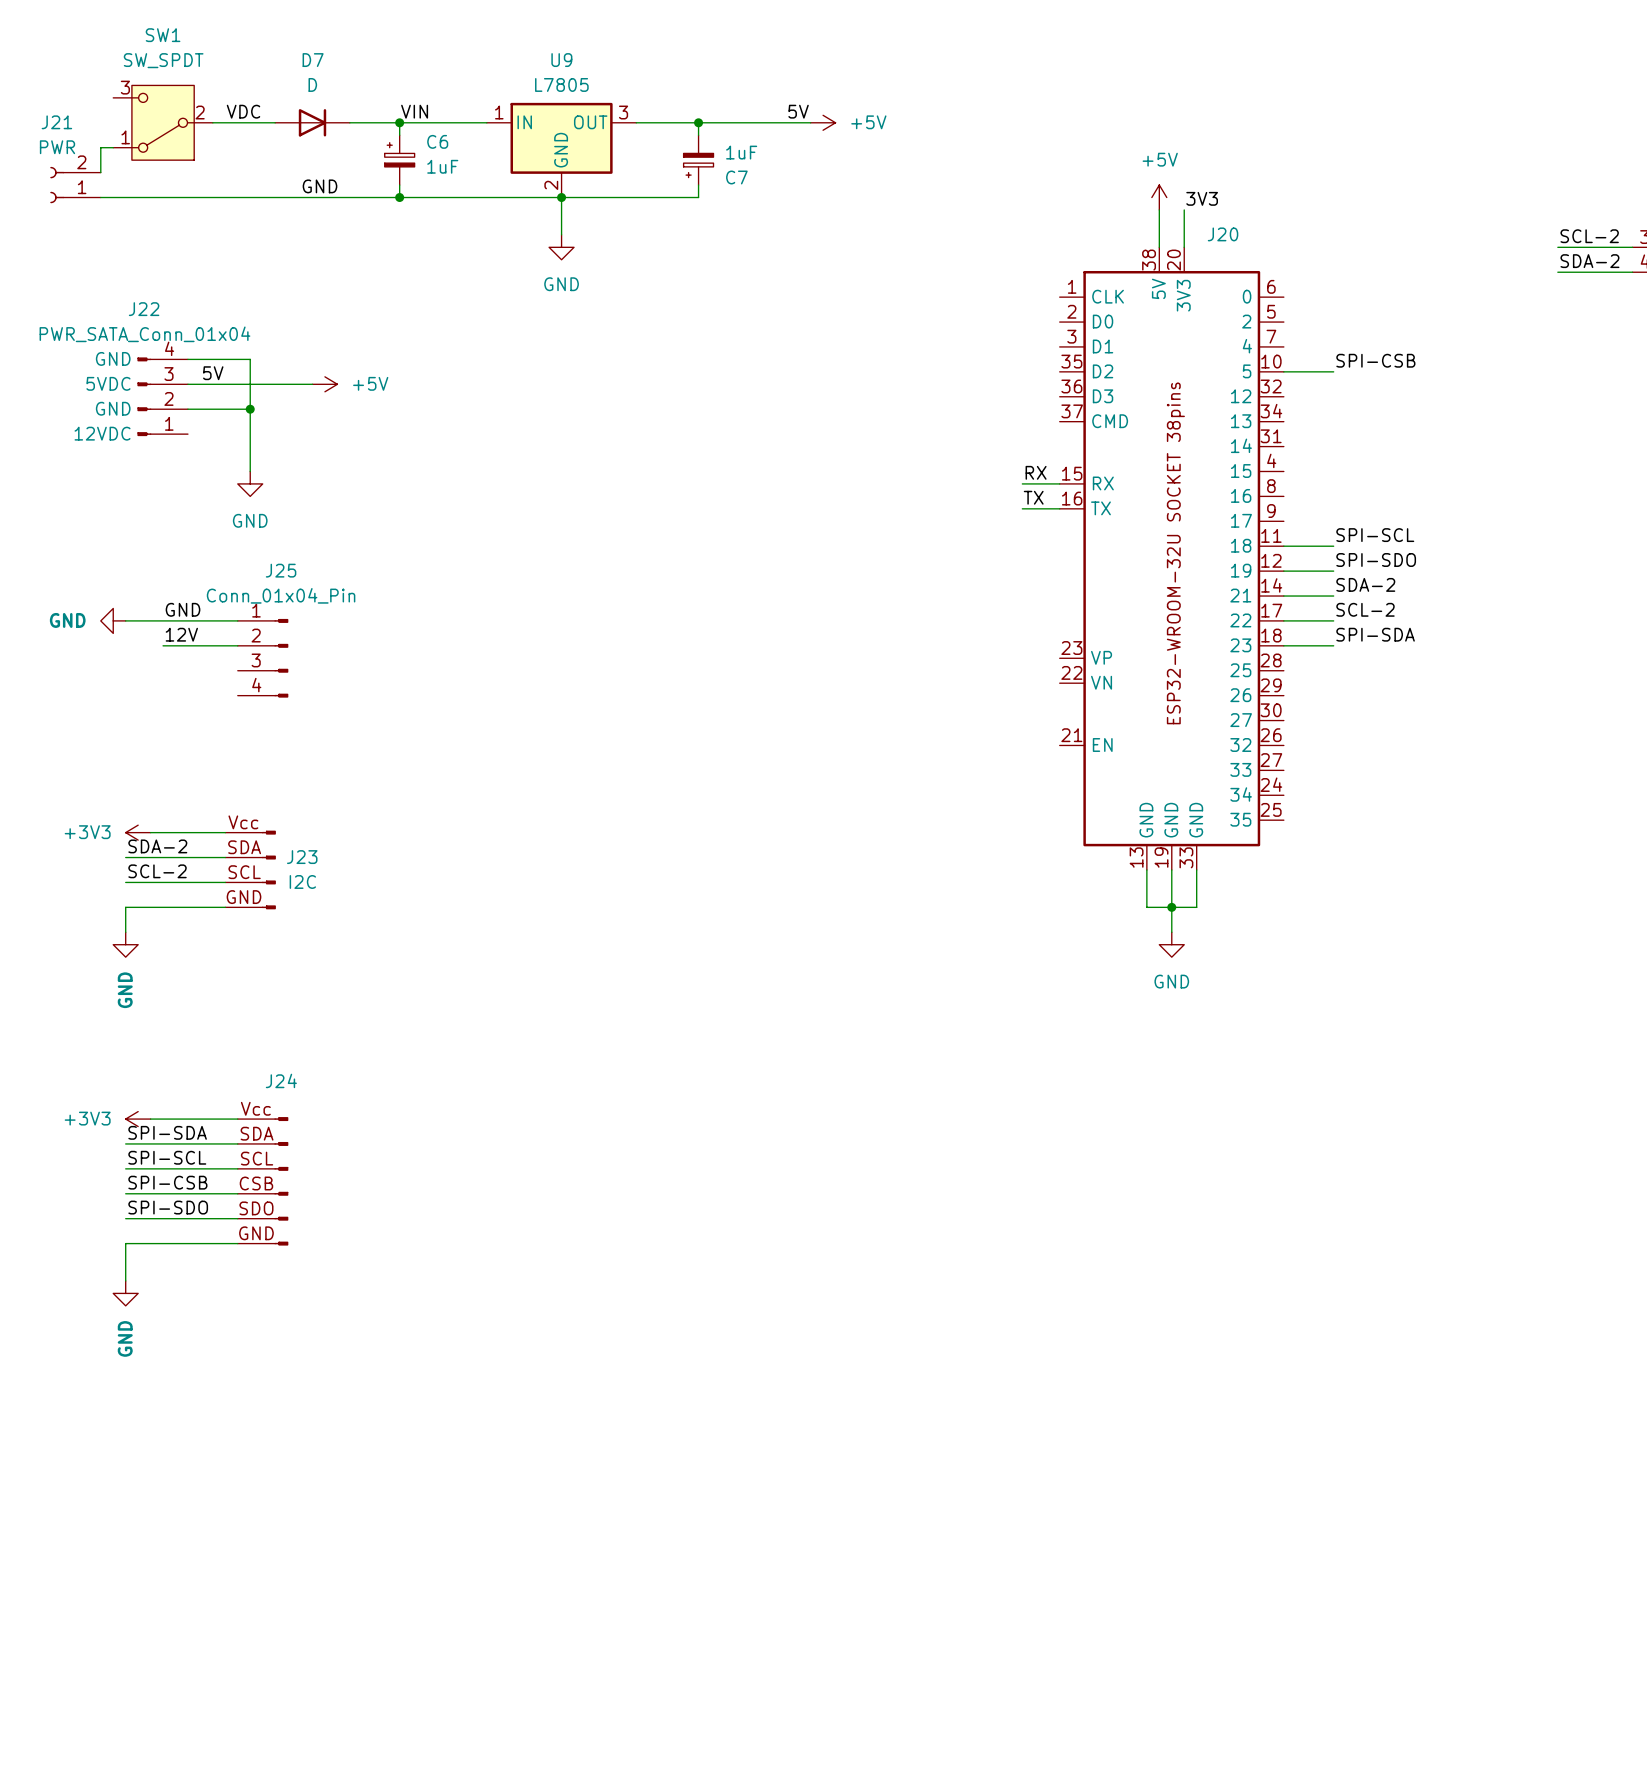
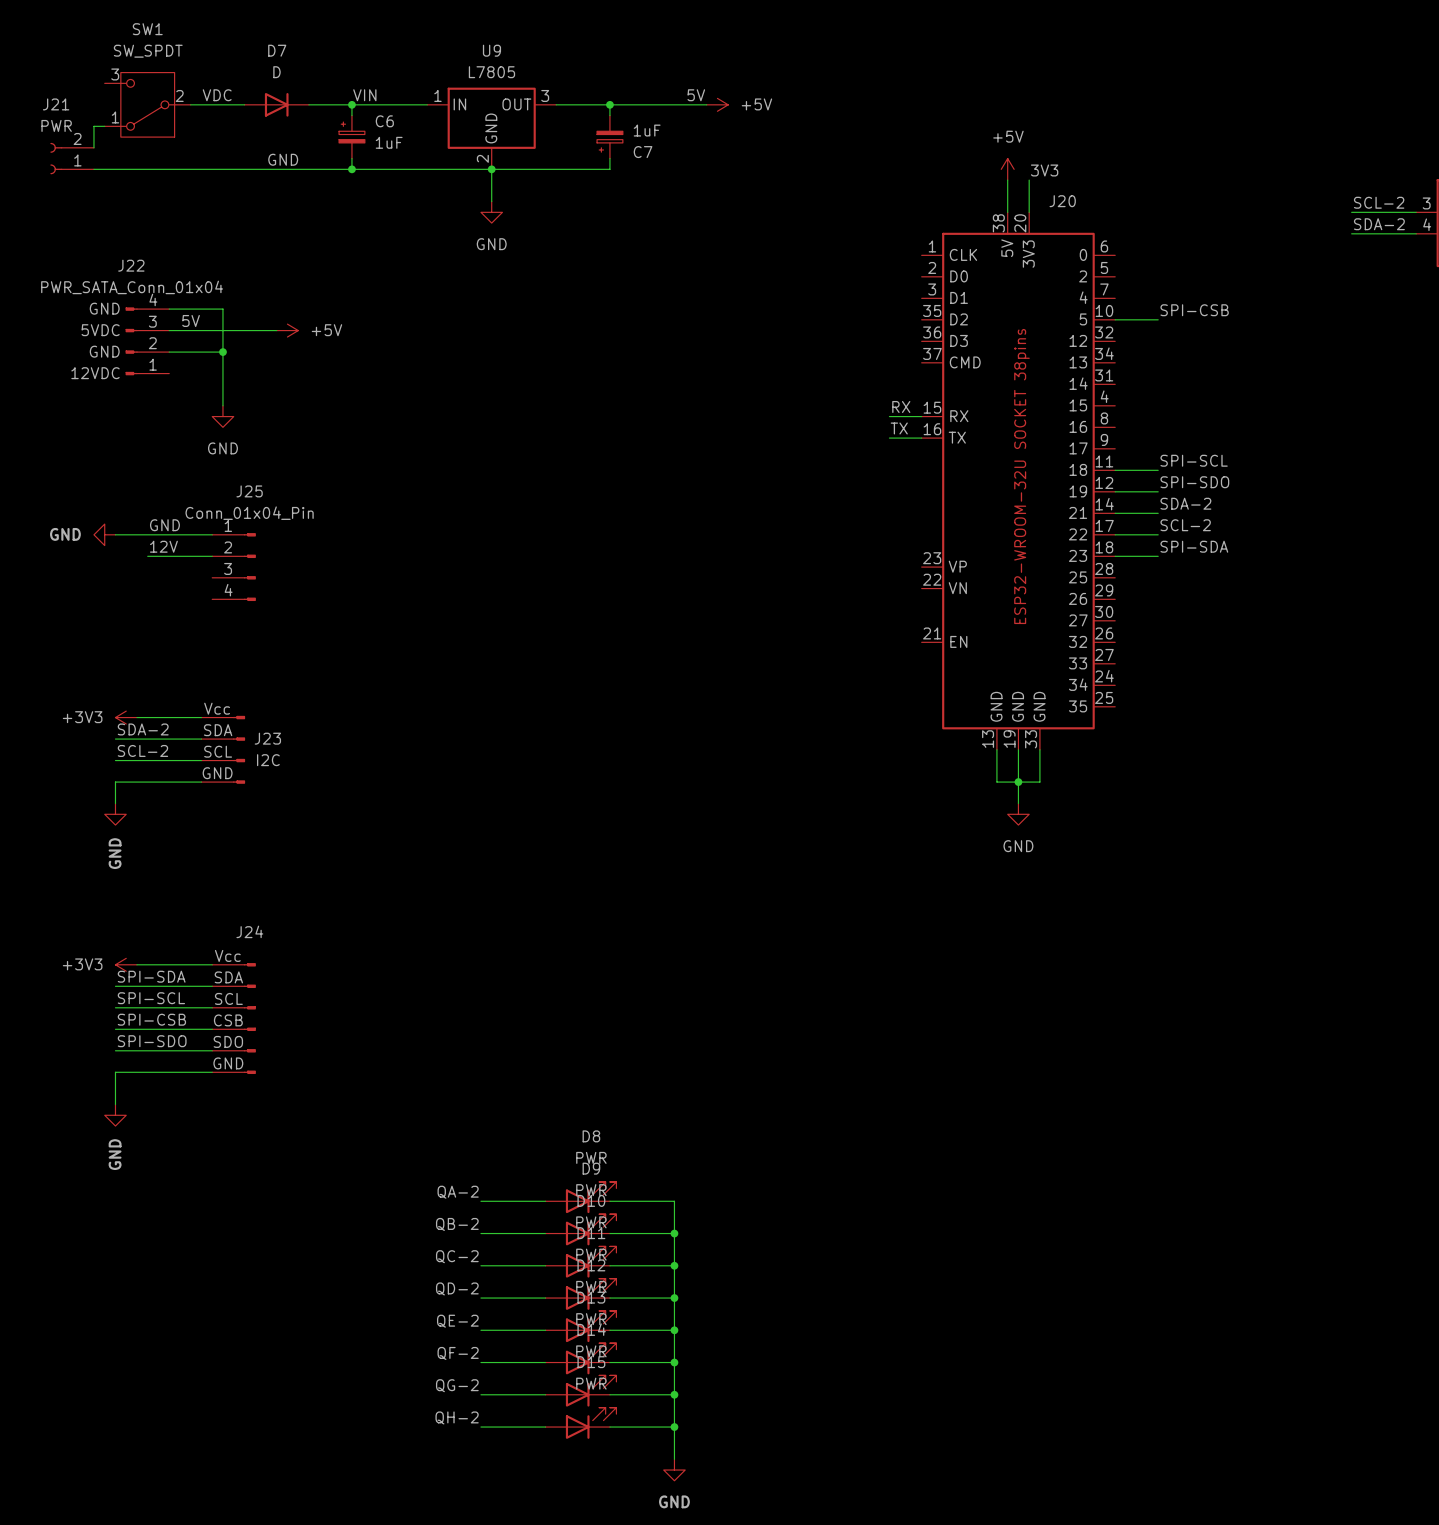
label: none -> QA-2 (458, 1192)
D8: none -> PWR (580, 1197)
wire: none -> (480, 1201) (545, 1201)
wire: none -> (609, 1201) (674, 1201) (674, 1459)
label: none -> QB-2 (457, 1224)
D9: none -> PWR (580, 1229)
wire: none -> (480, 1233) (545, 1233)
wire: none -> (609, 1233) (674, 1233)
junction: none -> (674, 1233)
label: none -> QC-2 (457, 1256)
D10: none -> PWR (580, 1262)
wire: none -> (480, 1265) (545, 1265)
wire: none -> (609, 1265) (674, 1265)
junction: none -> (674, 1265)
label: none -> QD-2 (457, 1288)
D11: none -> PWR (580, 1294)
wire: none -> (480, 1298) (545, 1298)
wire: none -> (609, 1298) (674, 1298)
junction: none -> (674, 1298)
label: none -> QE-2 (457, 1321)
D12: none -> PWR (580, 1326)
wire: none -> (480, 1330) (545, 1330)
wire: none -> (609, 1330) (674, 1330)
junction: none -> (674, 1330)
label: none -> QF-2 (458, 1353)
D13: none -> PWR (580, 1358)
wire: none -> (480, 1362) (545, 1362)
wire: none -> (609, 1362) (674, 1362)
junction: none -> (674, 1362)
label: none -> QG-2 (457, 1385)
D14: none -> PWR (580, 1391)
wire: none -> (480, 1394) (545, 1394)
wire: none -> (609, 1394) (674, 1394)
junction: none -> (674, 1394)
label: none -> QH-2 (457, 1417)
D15: none -> PWR (580, 1423)
wire: none -> (480, 1427) (545, 1427)
wire: none -> (609, 1427) (674, 1427)
junction: none -> (674, 1427)
power symbol: none -> GND (674, 1470)

